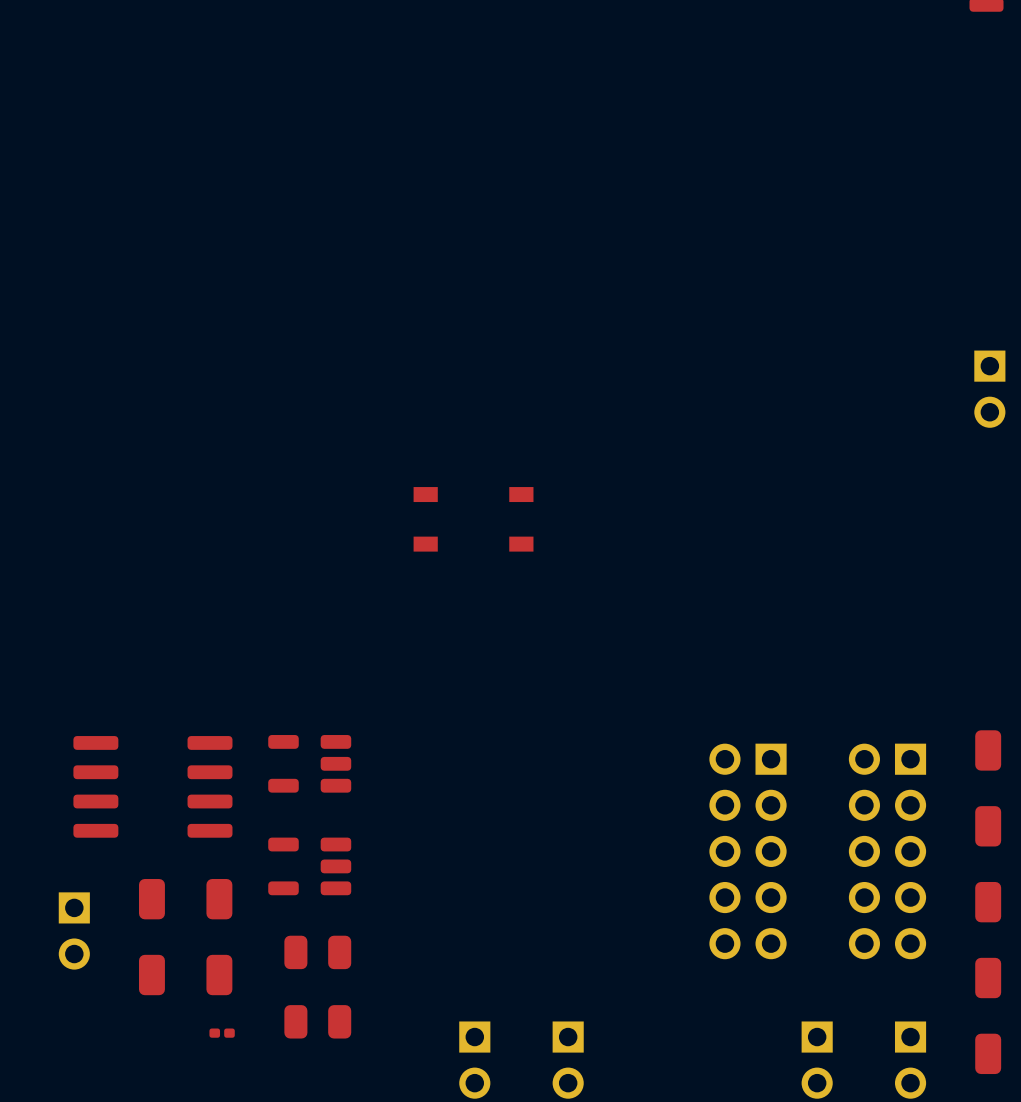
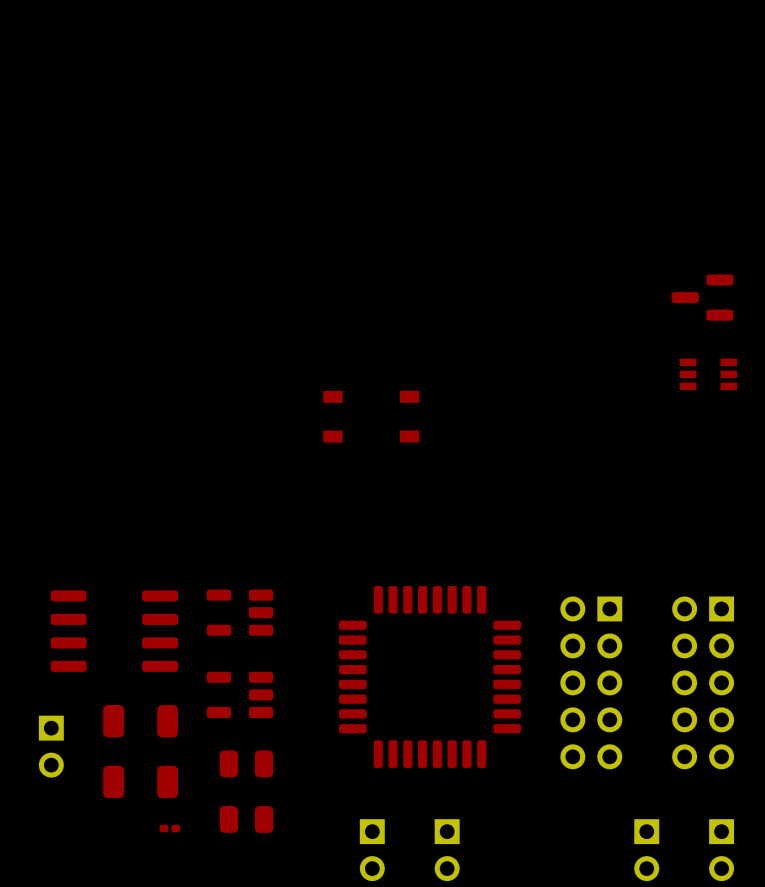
part: none -> (702, 297)
part: none -> (708, 374)
part: none -> (429, 676)

